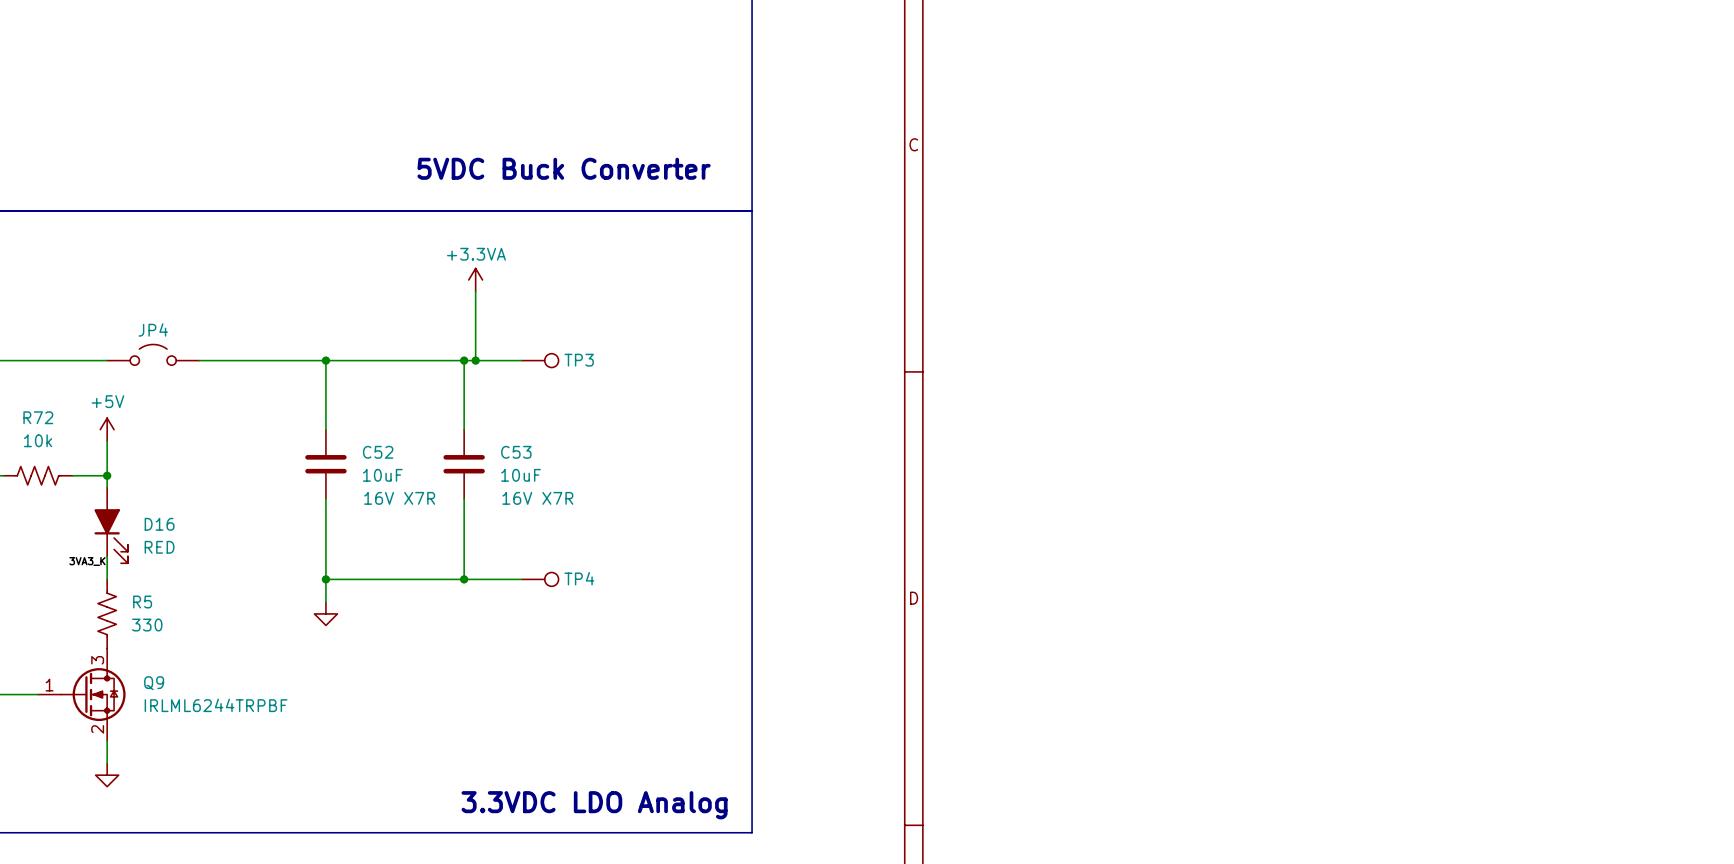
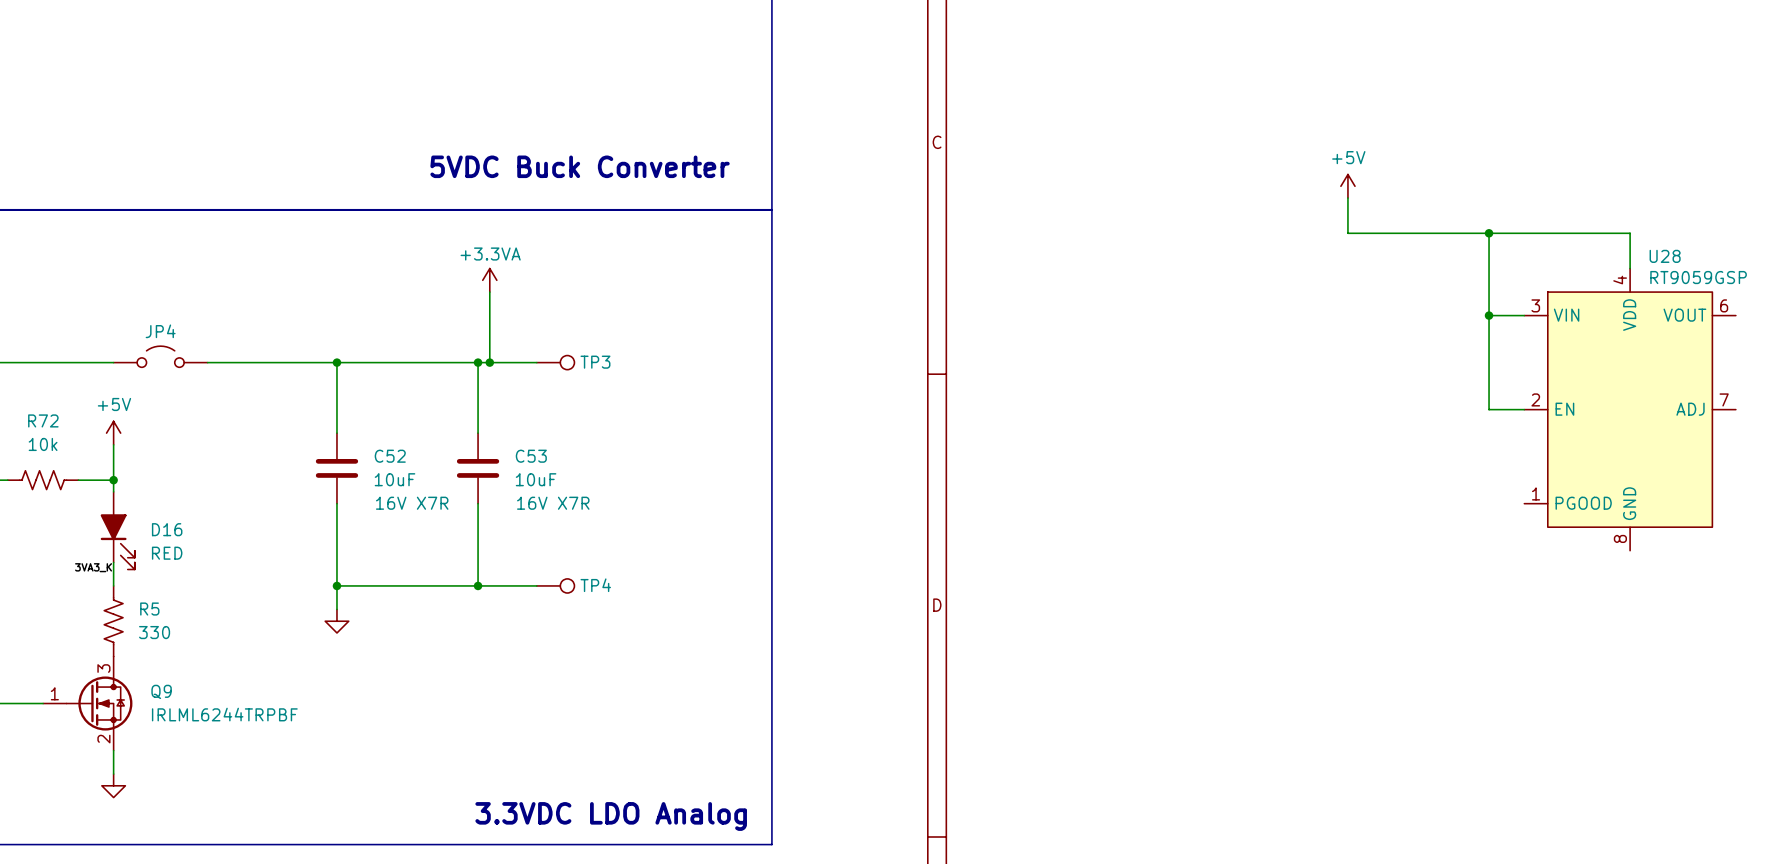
power symbol: none -> +5V (1347, 186)
wire: none -> (1347, 198) (1347, 233) (1630, 233) (1630, 268)
wire: none -> (1489, 233) (1489, 409) (1524, 409)
junction: none -> (1489, 233)
wire: none -> (1489, 315) (1524, 315)
junction: none -> (1489, 315)
U28: none -> RT9059GSP (1630, 409)

